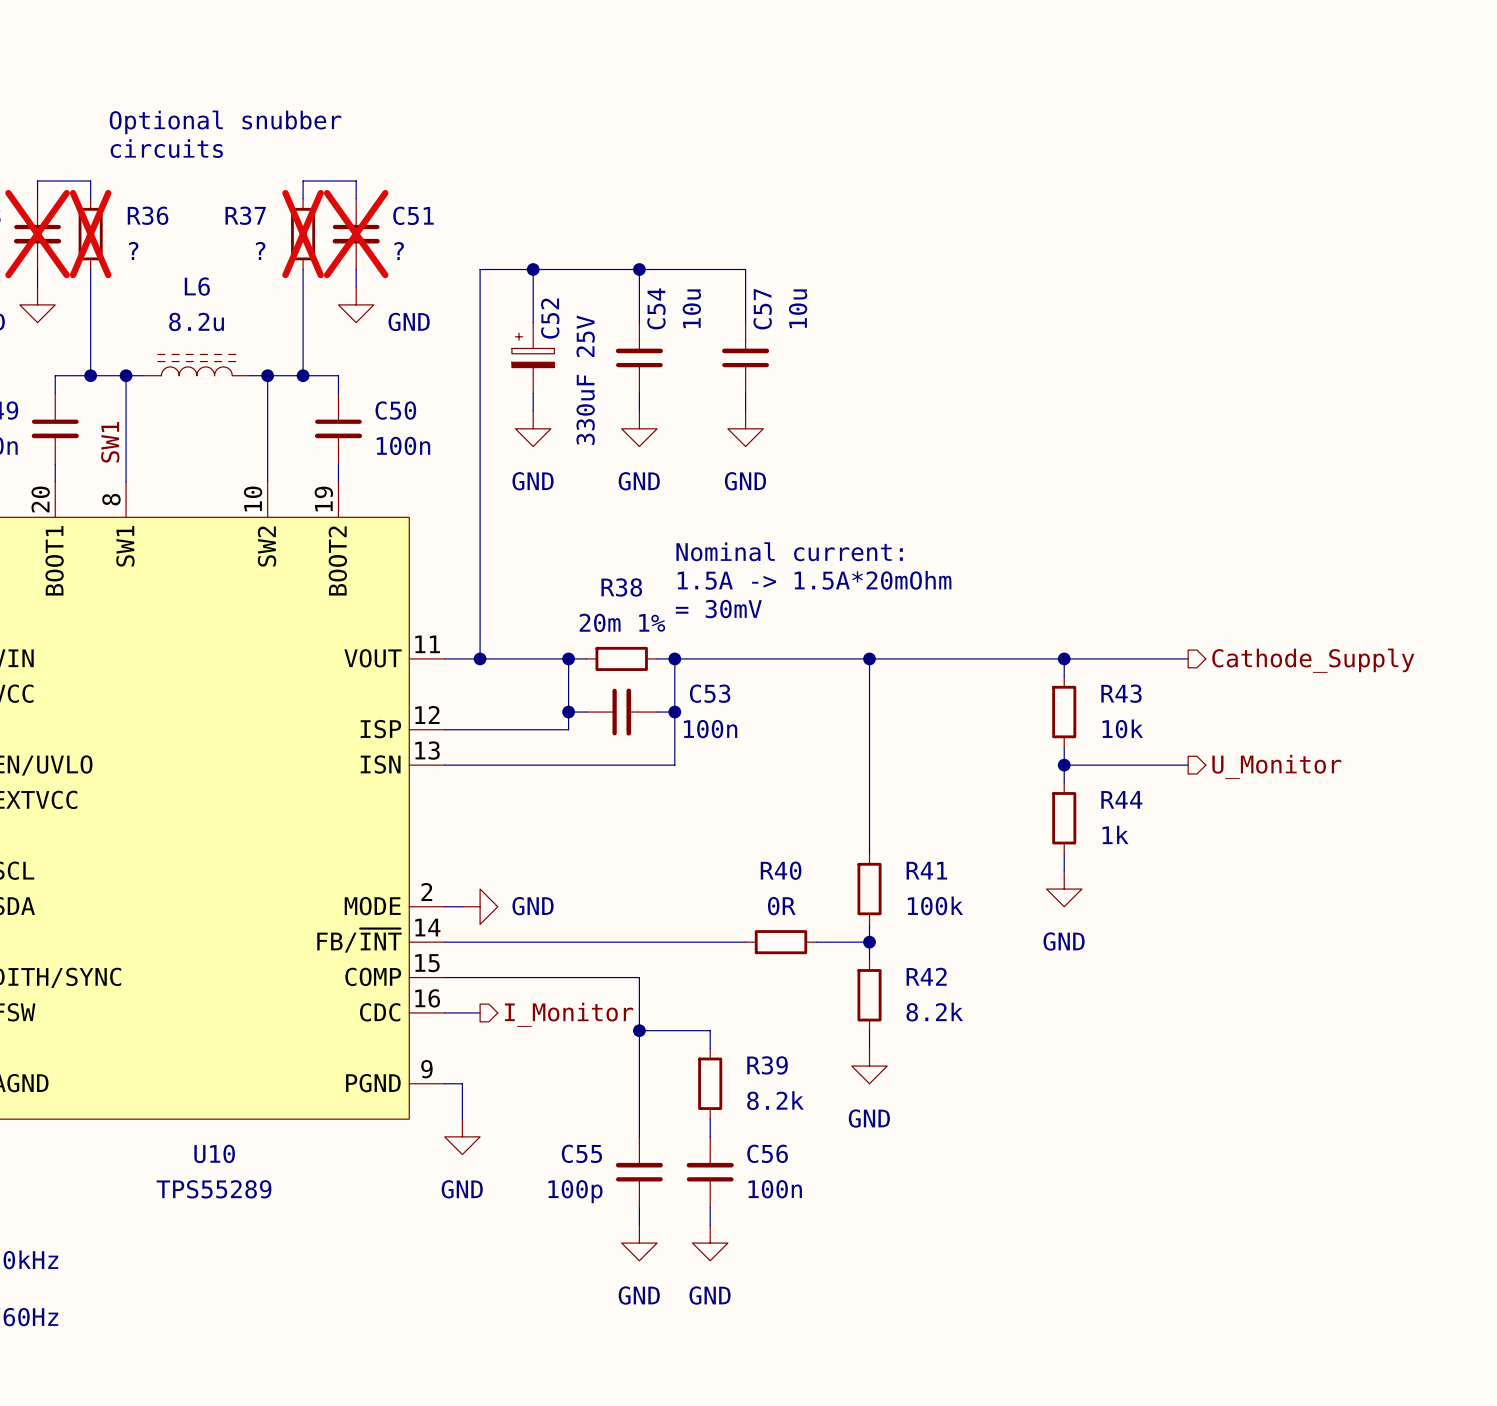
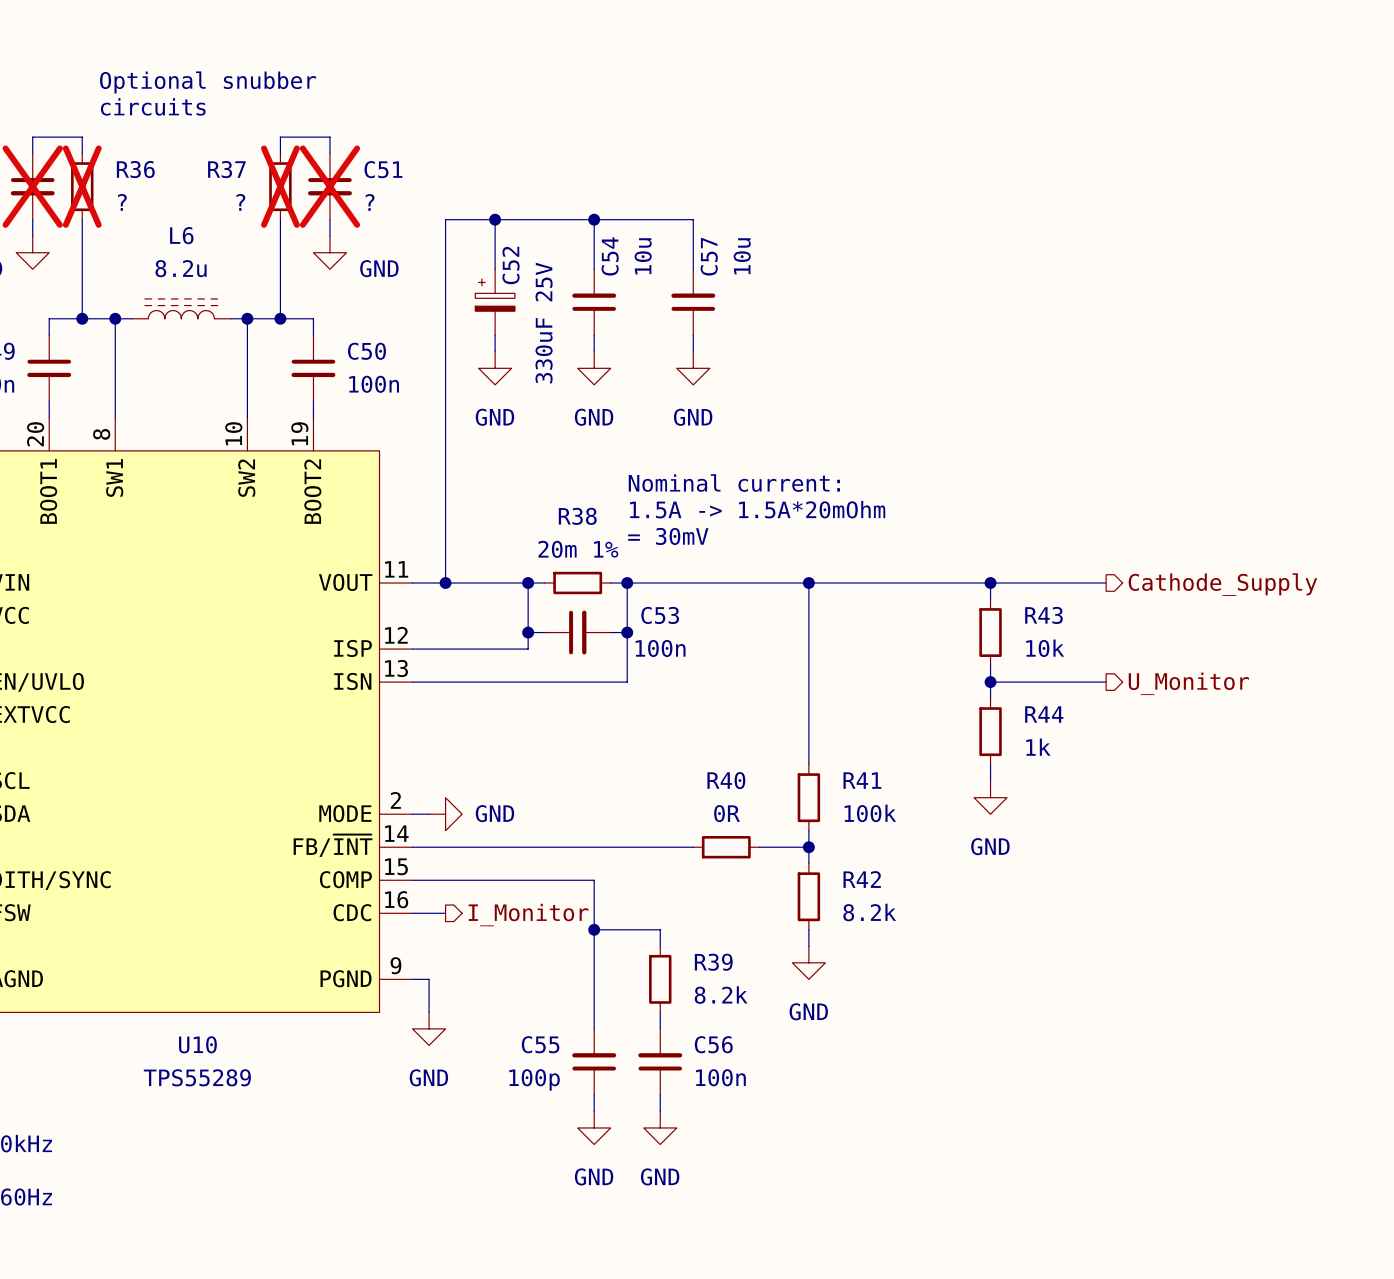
label: SW1 (110, 442) -> none

